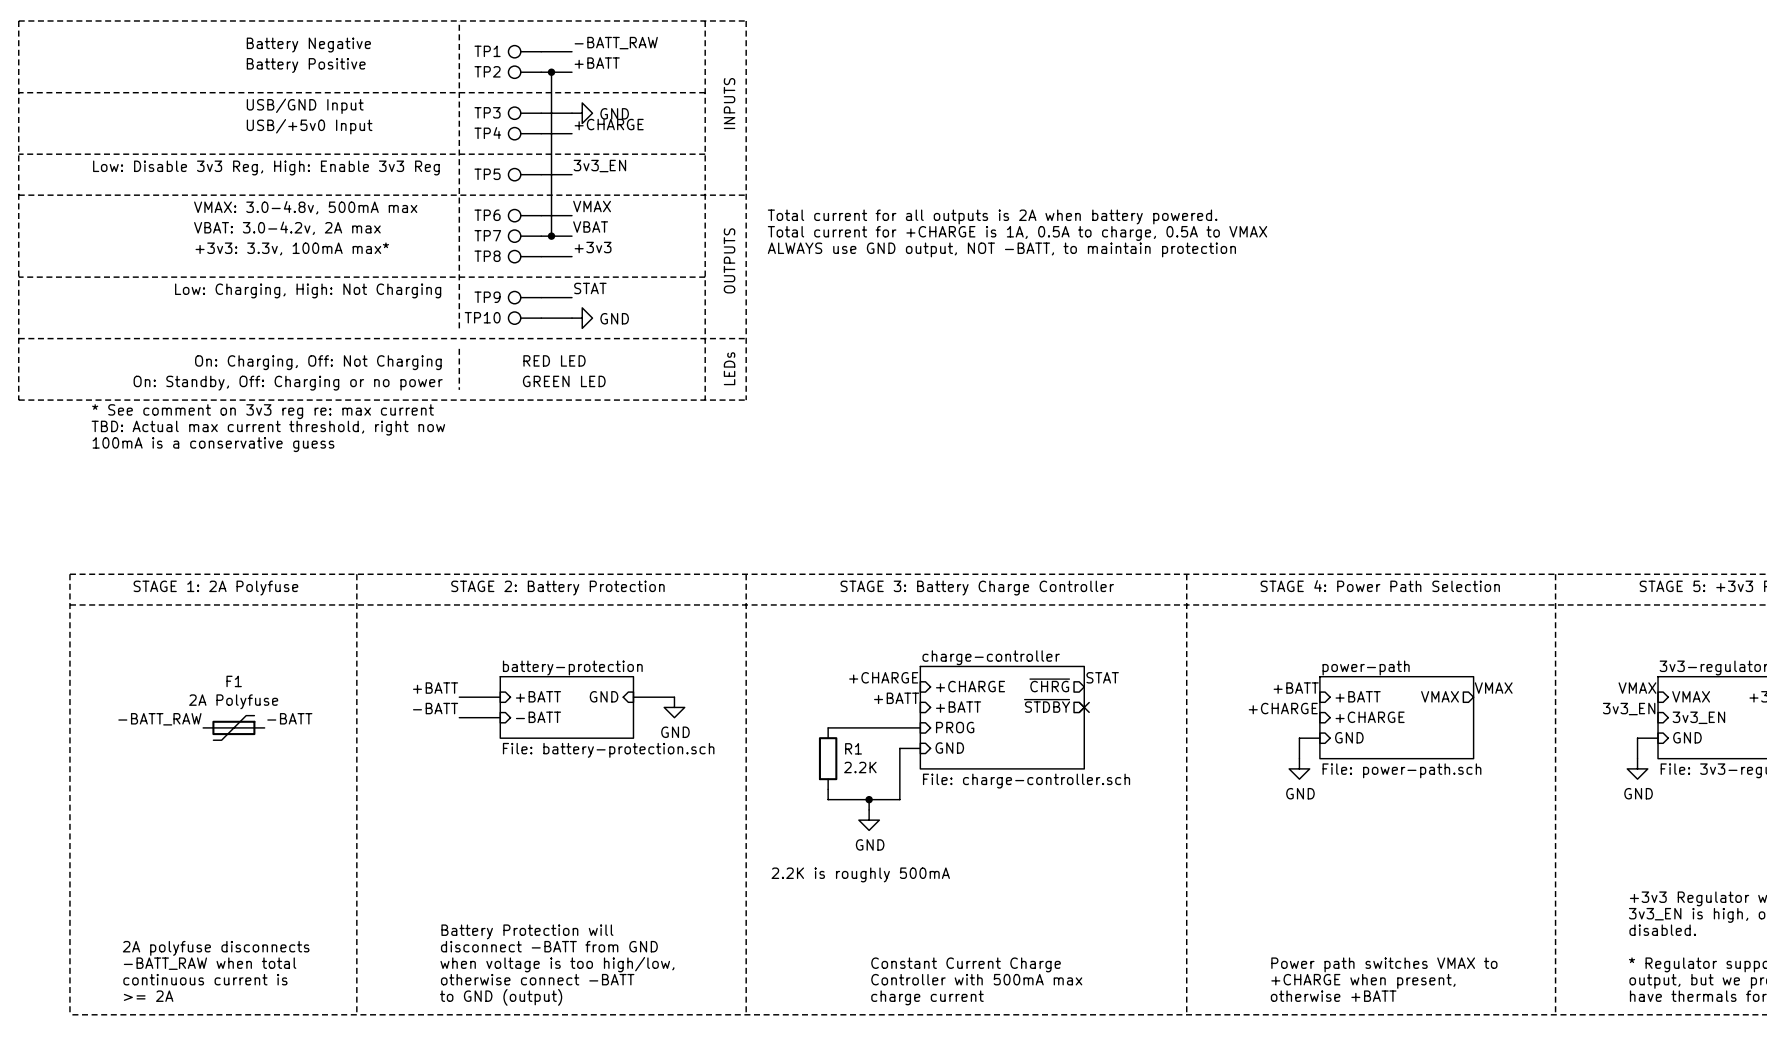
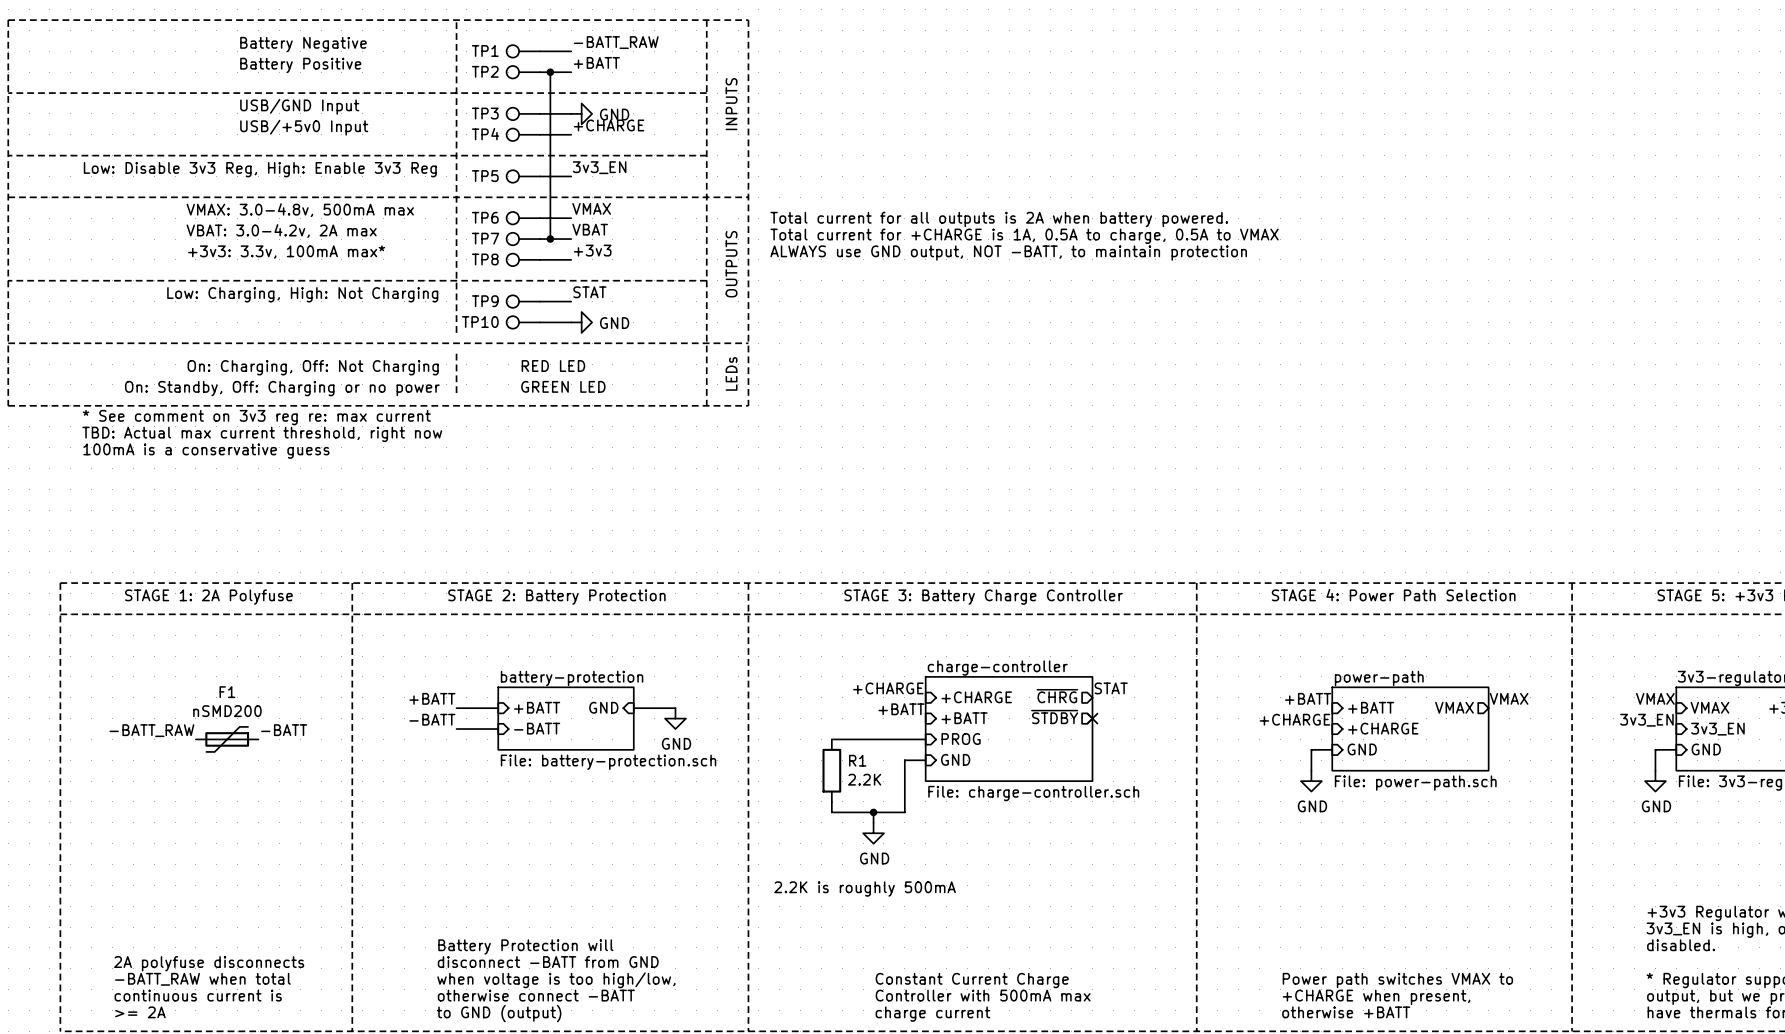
F1 value: 2A Polyfuse (233, 701) -> nSMD200 (227, 711)

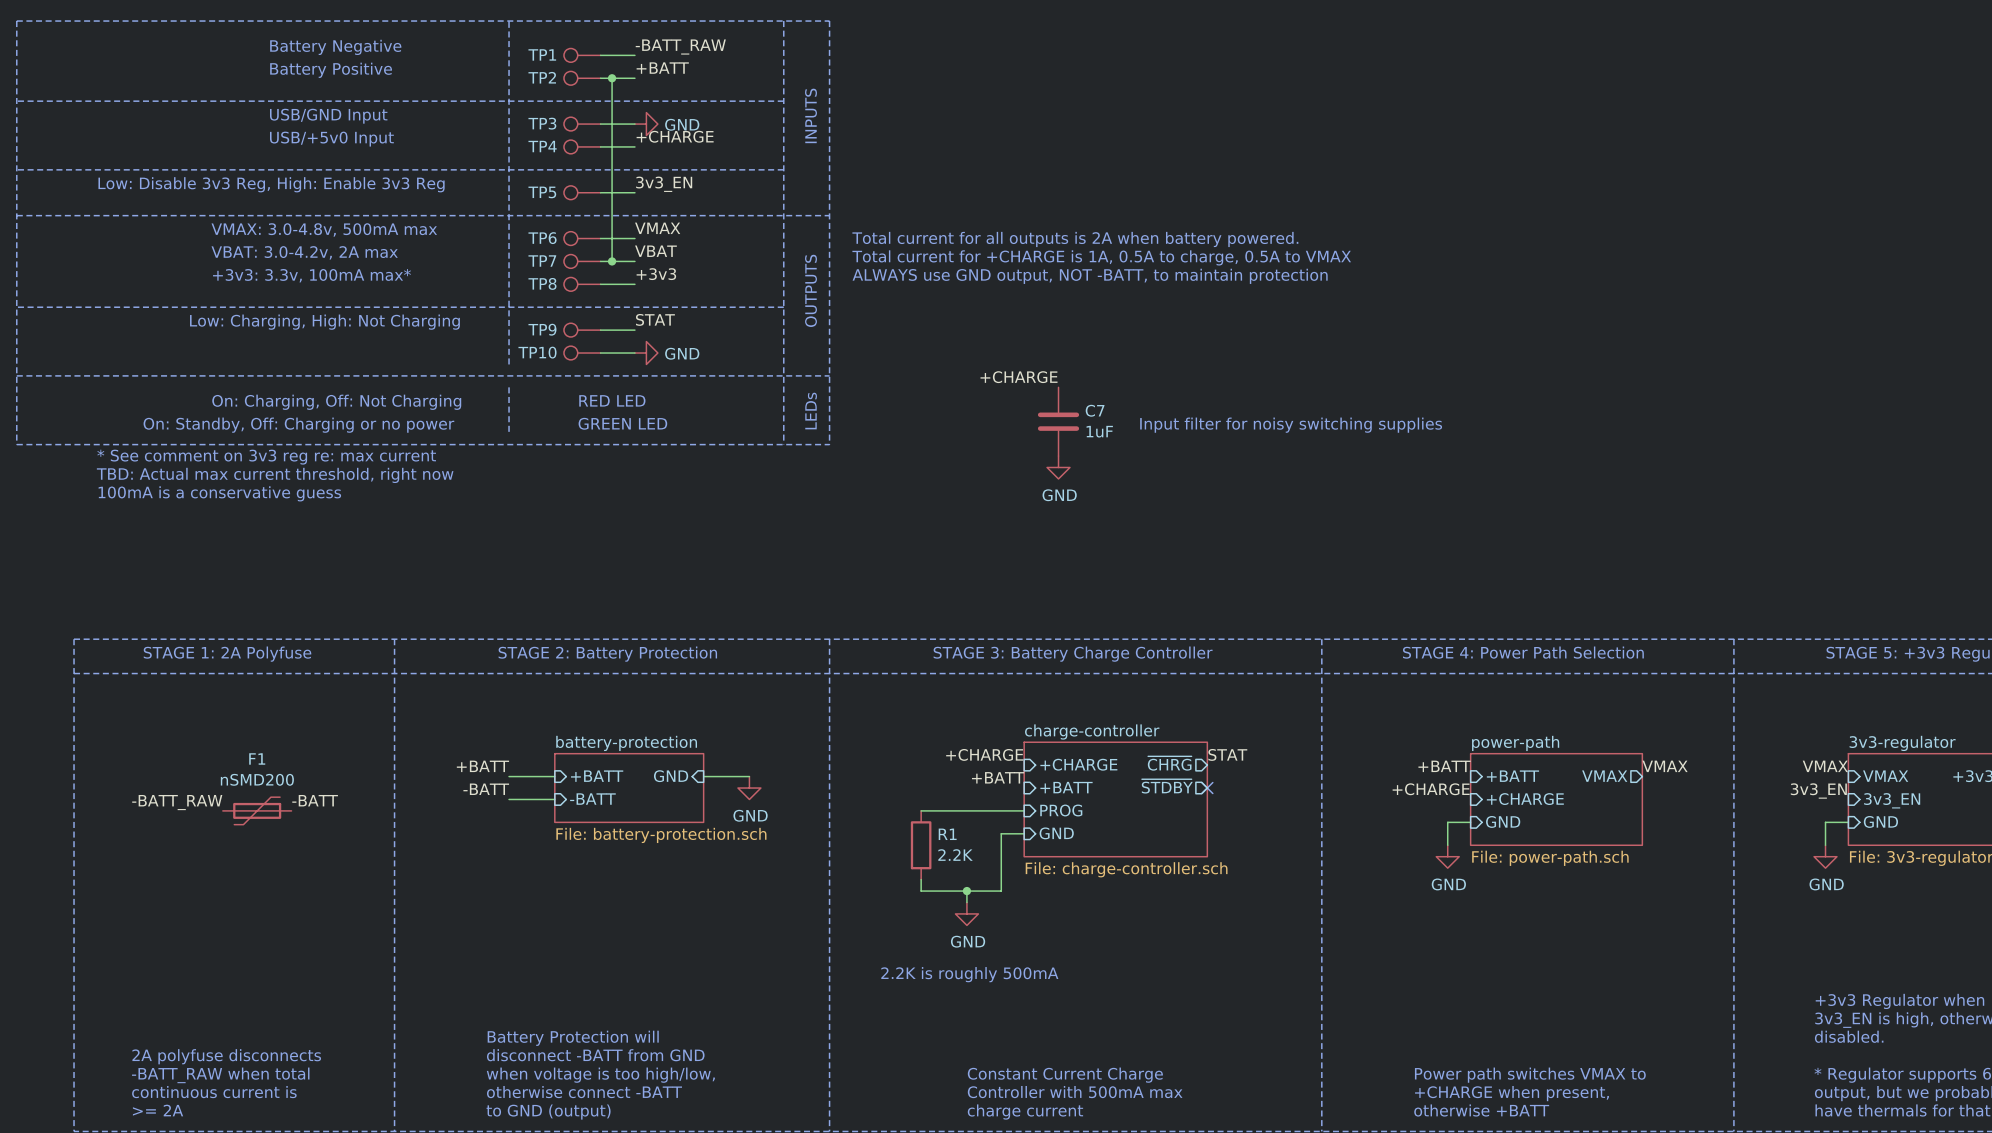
label: none -> +CHARGE (1019, 377)
C7: none -> 1uF (1058, 421)
text: none -> Input filter for noisy switching supplies (1291, 425)
power symbol: none -> GND (1058, 467)

